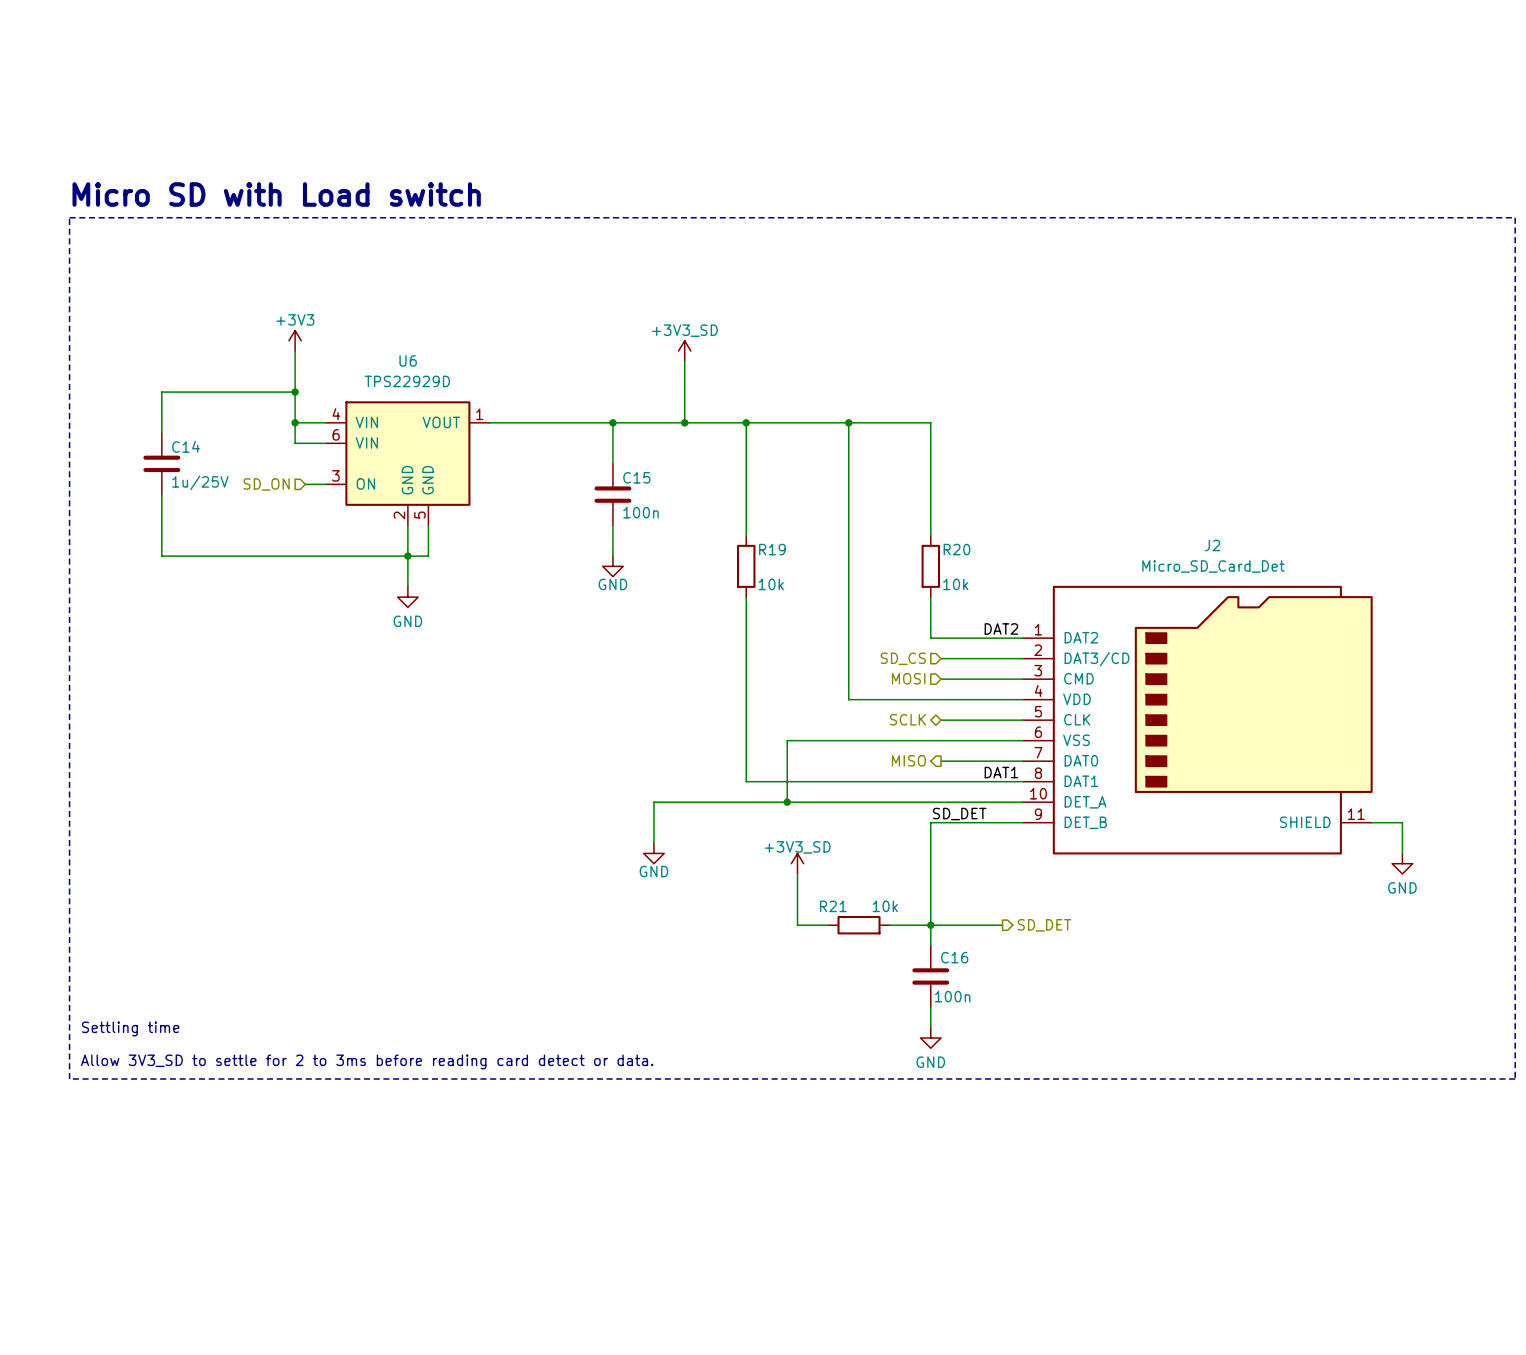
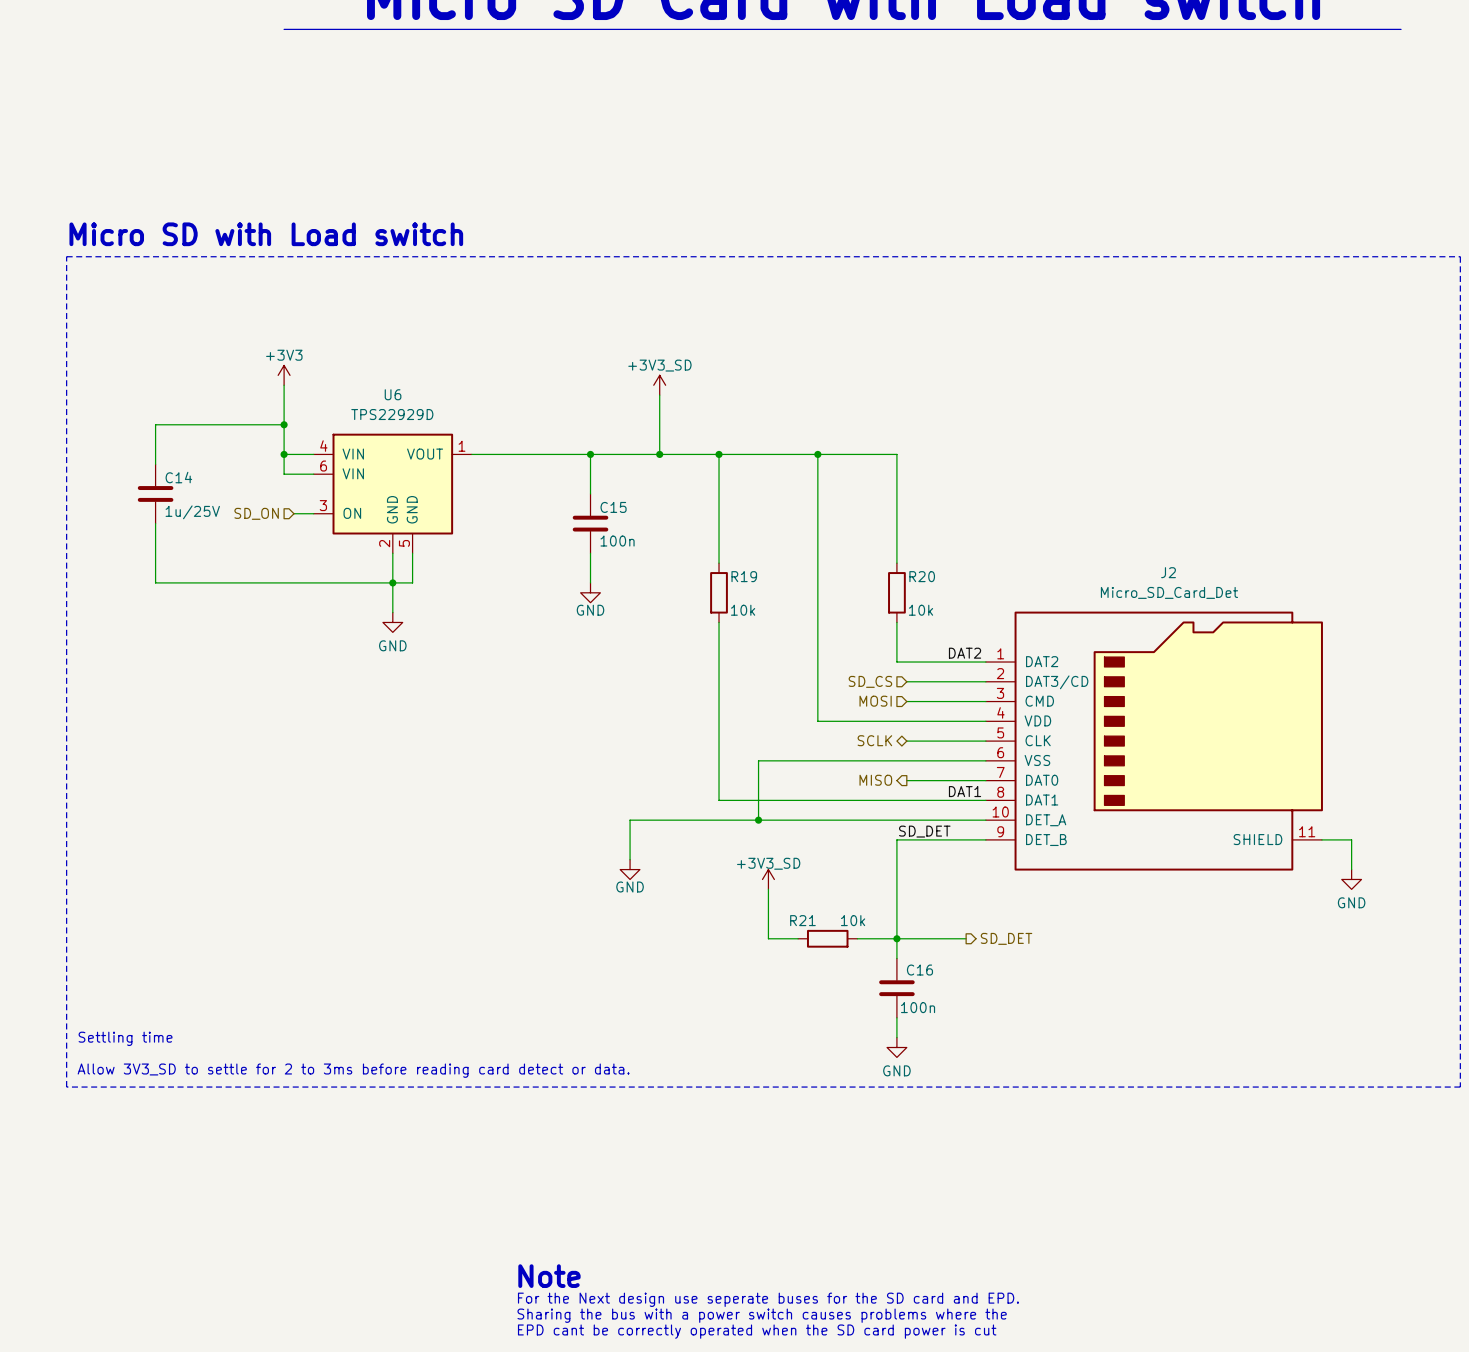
text: none -> Note (549, 1276)
text: none -> For the Next design use seperate buses for the SD card and EPD. (768, 1299)
text: none -> Sharing the bus with a power switch causes problems where the (762, 1315)
text: none -> EPD cant be correctly operated when the SD card power is cut (757, 1331)

